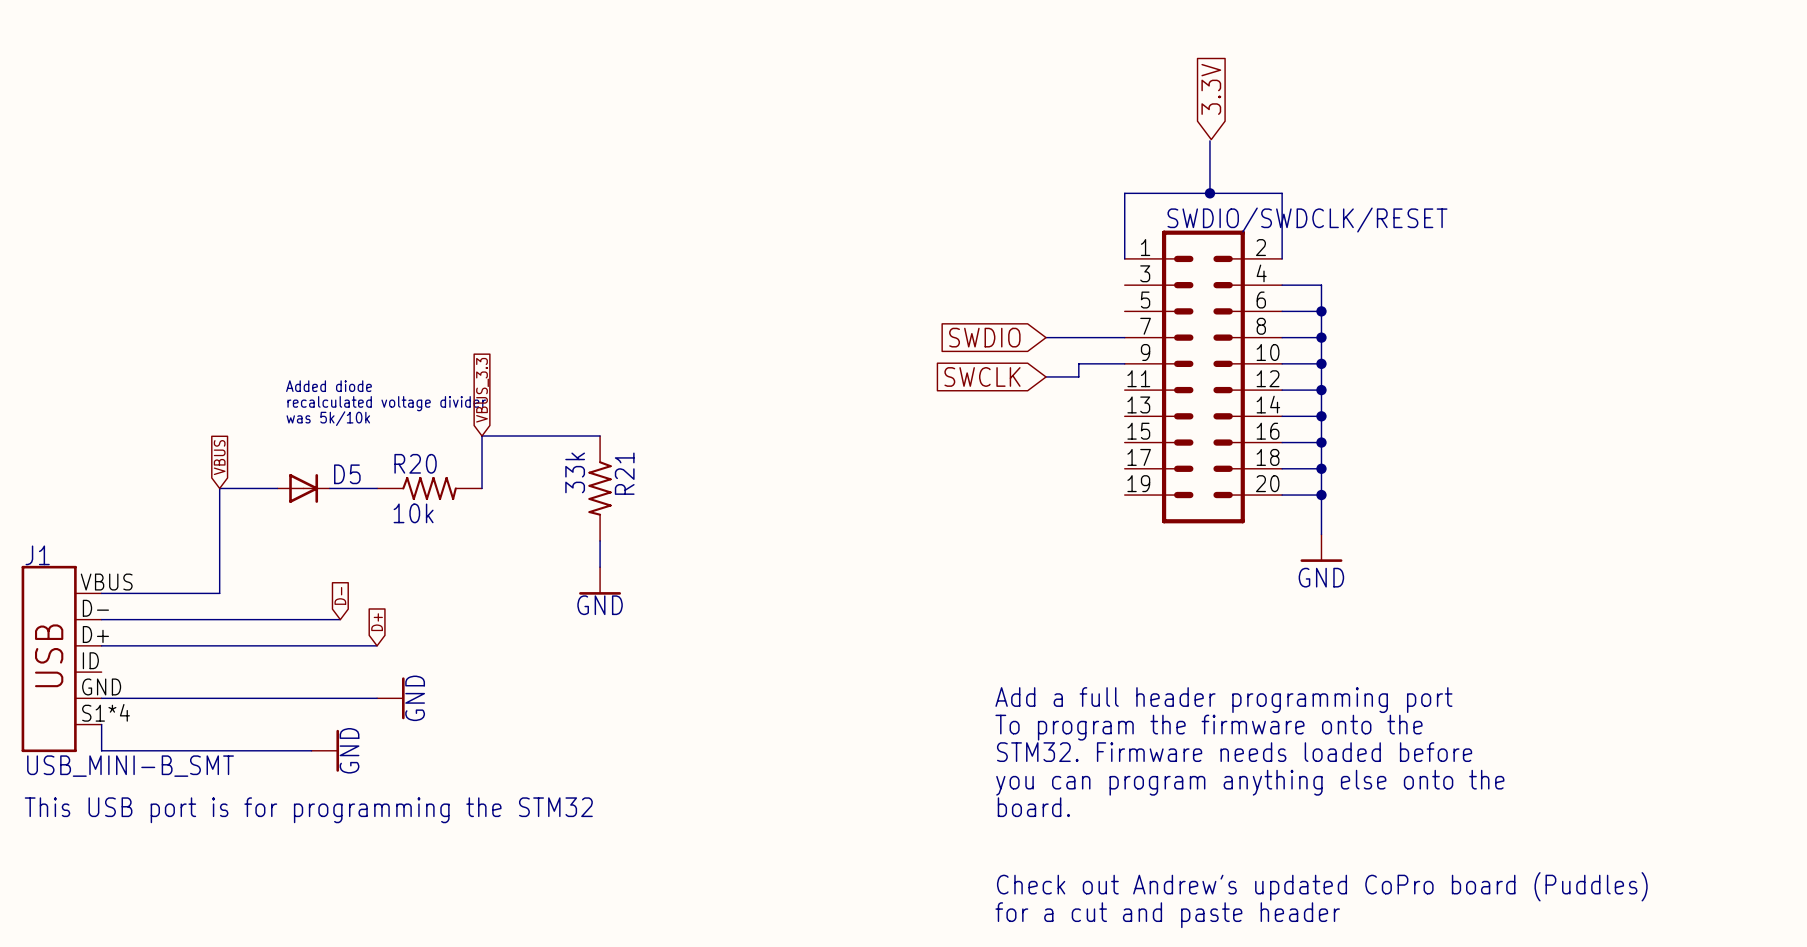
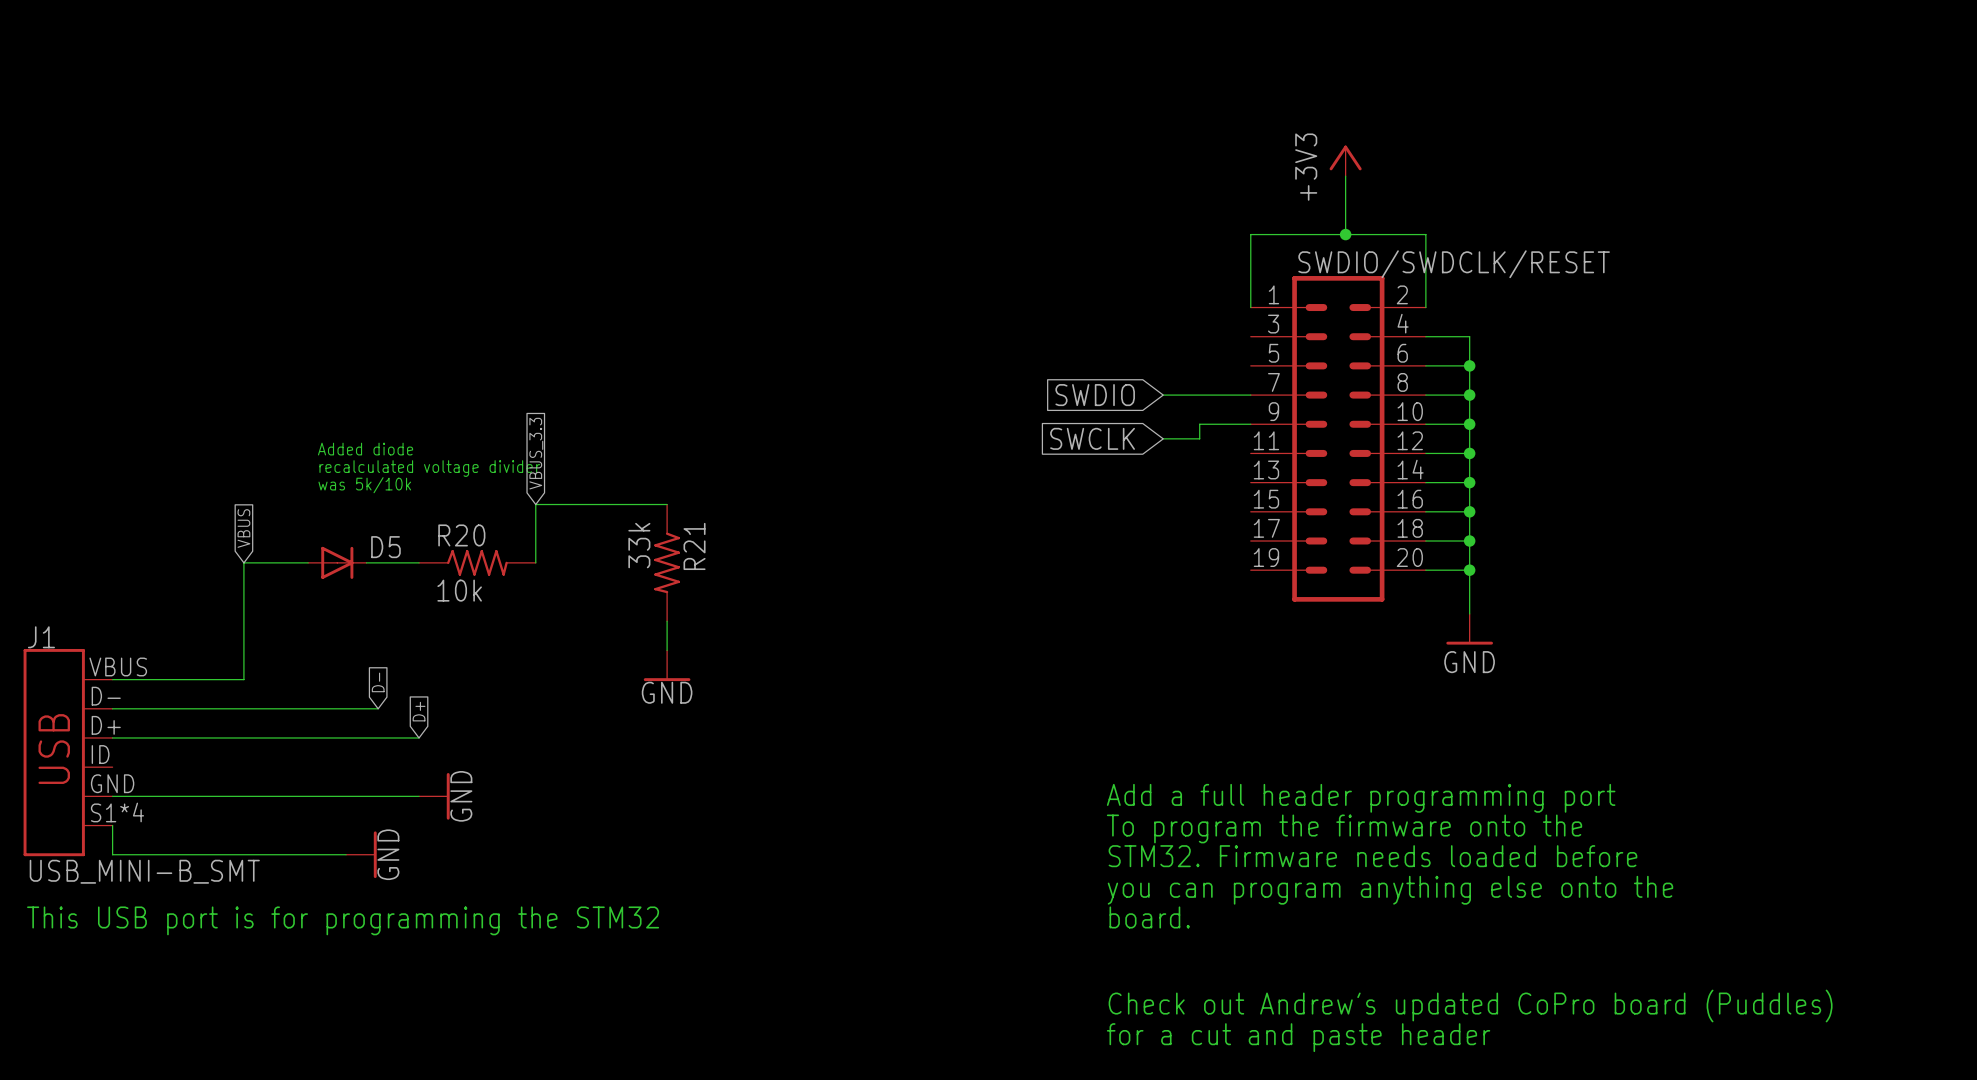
global label: 3.3V (1211, 89) -> none
power symbol: none -> +3V3 (1345, 160)

